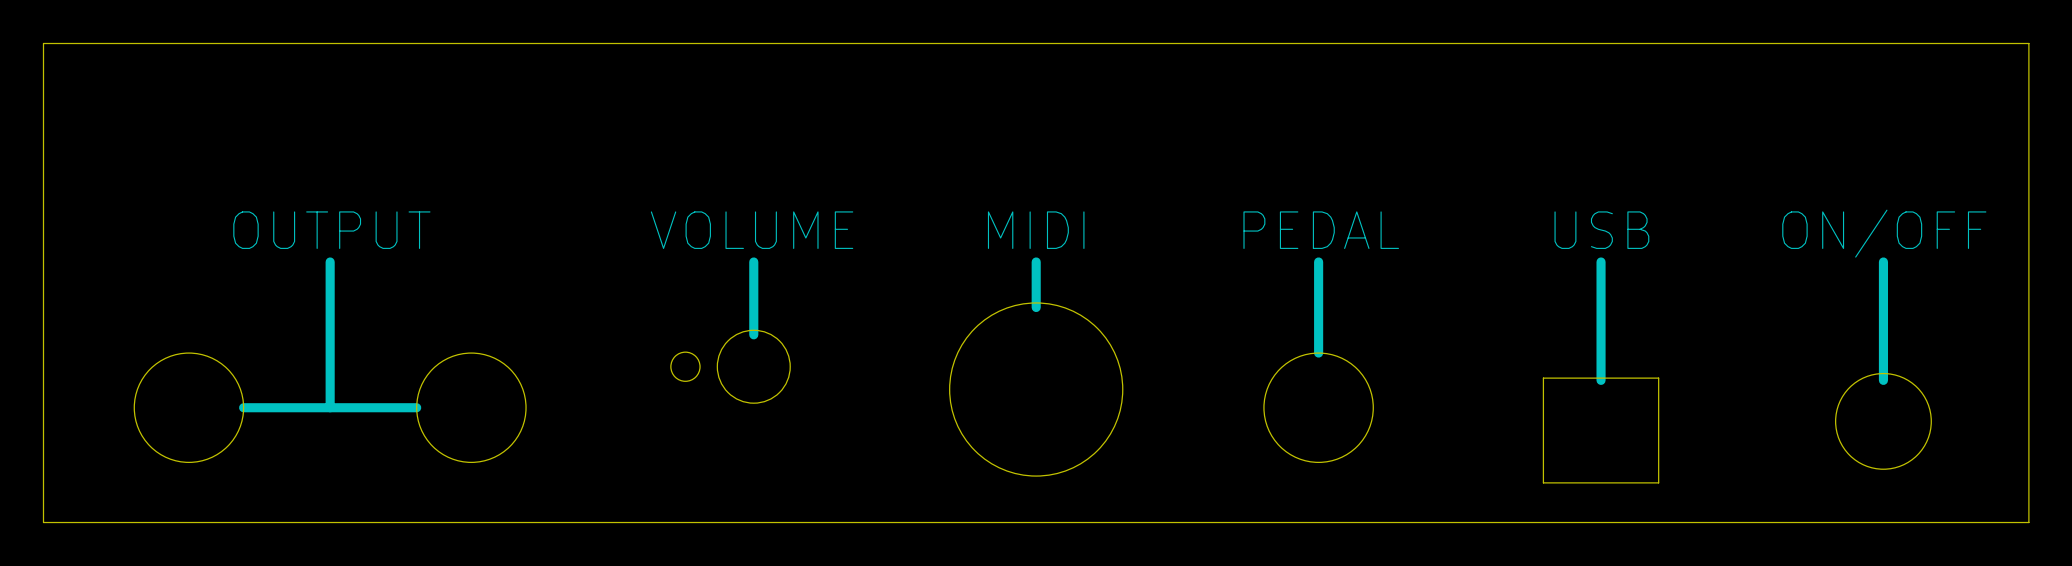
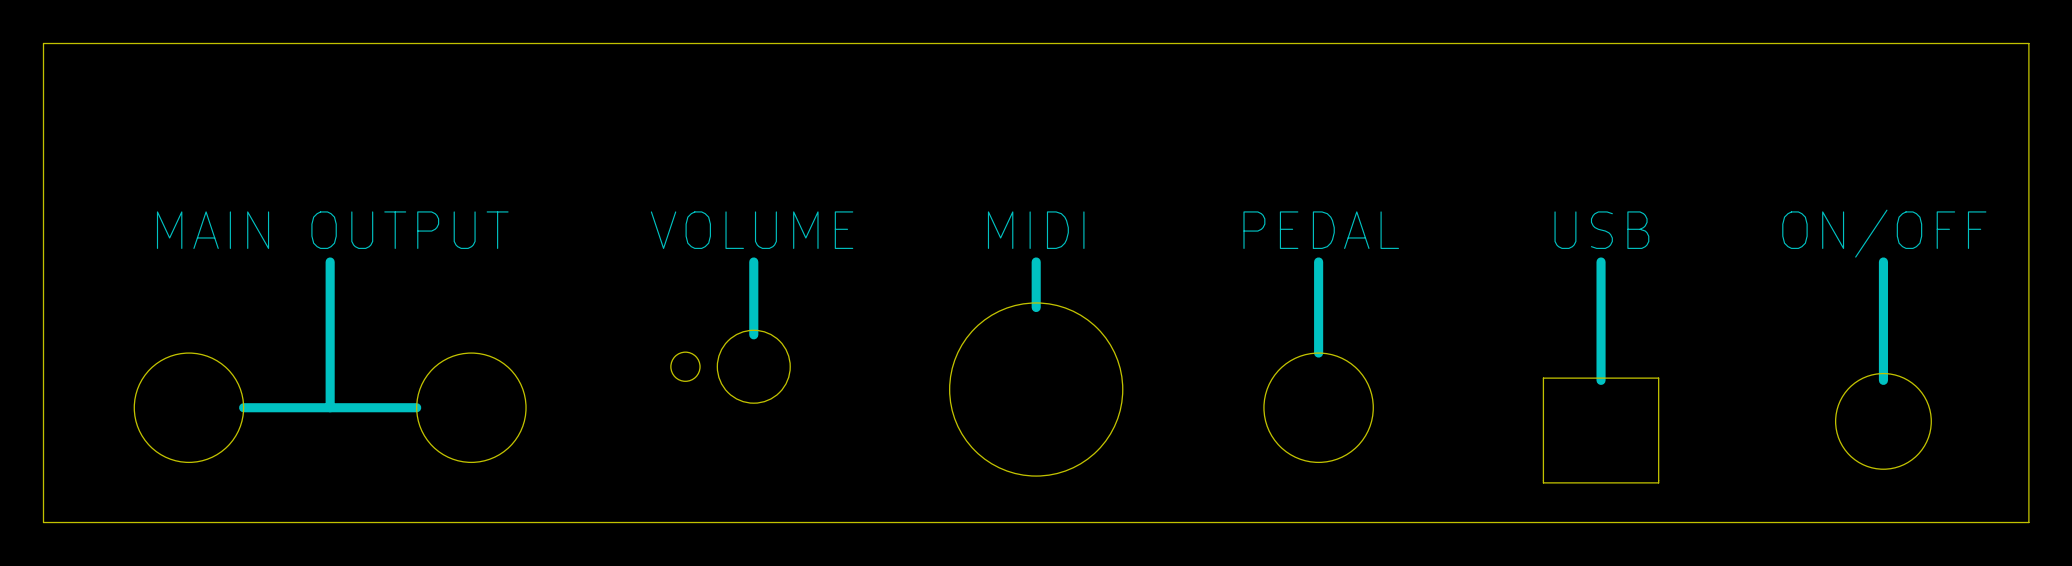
text: OUTPUT (331, 230) -> MAIN OUTPUT (332, 230)

